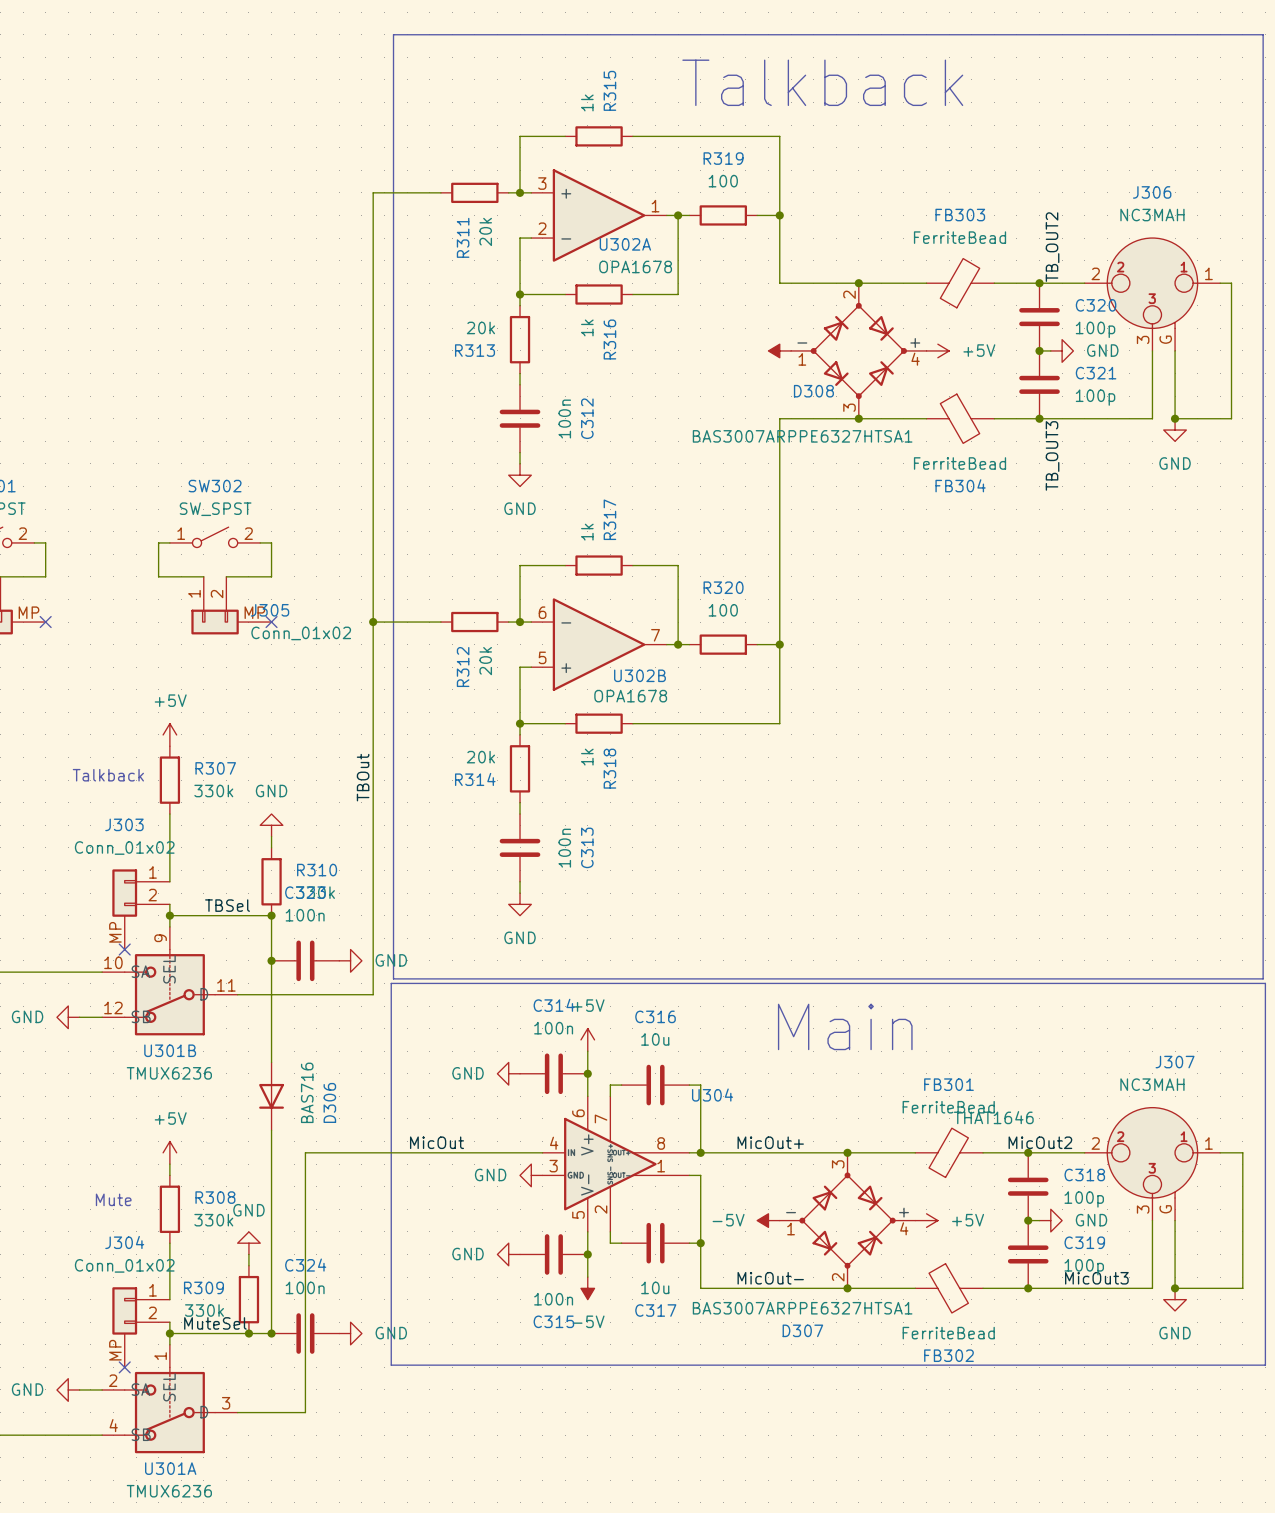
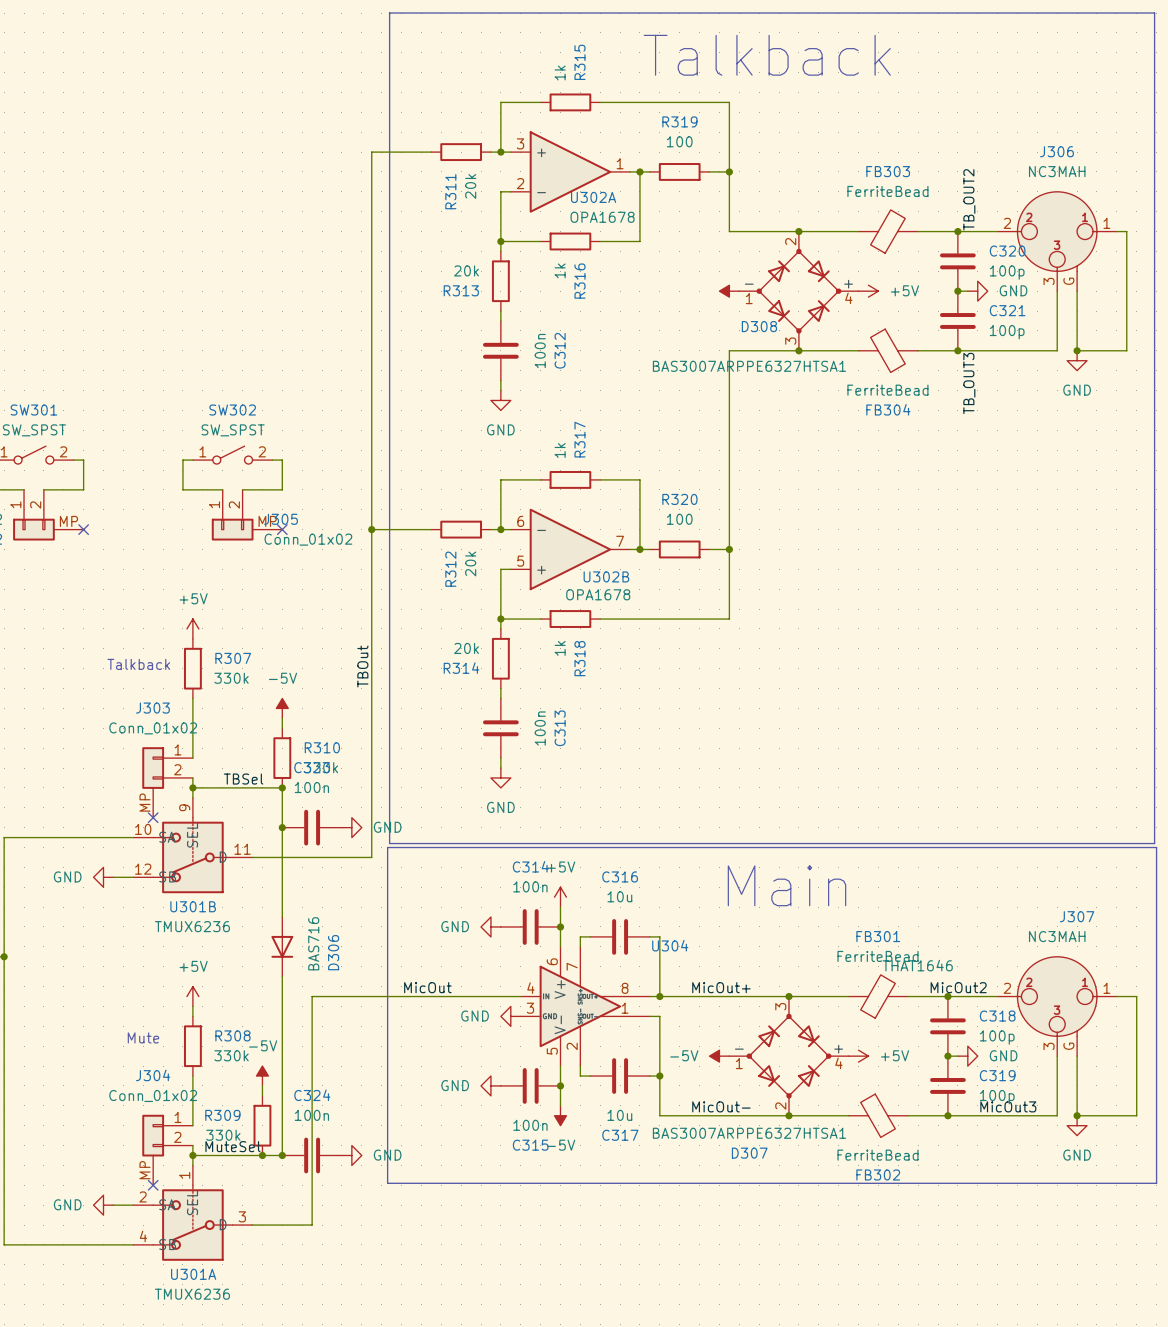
power symbol: GND (271, 825) -> -5V (282, 708)
power symbol: GND (248, 1243) -> -5V (262, 1076)

